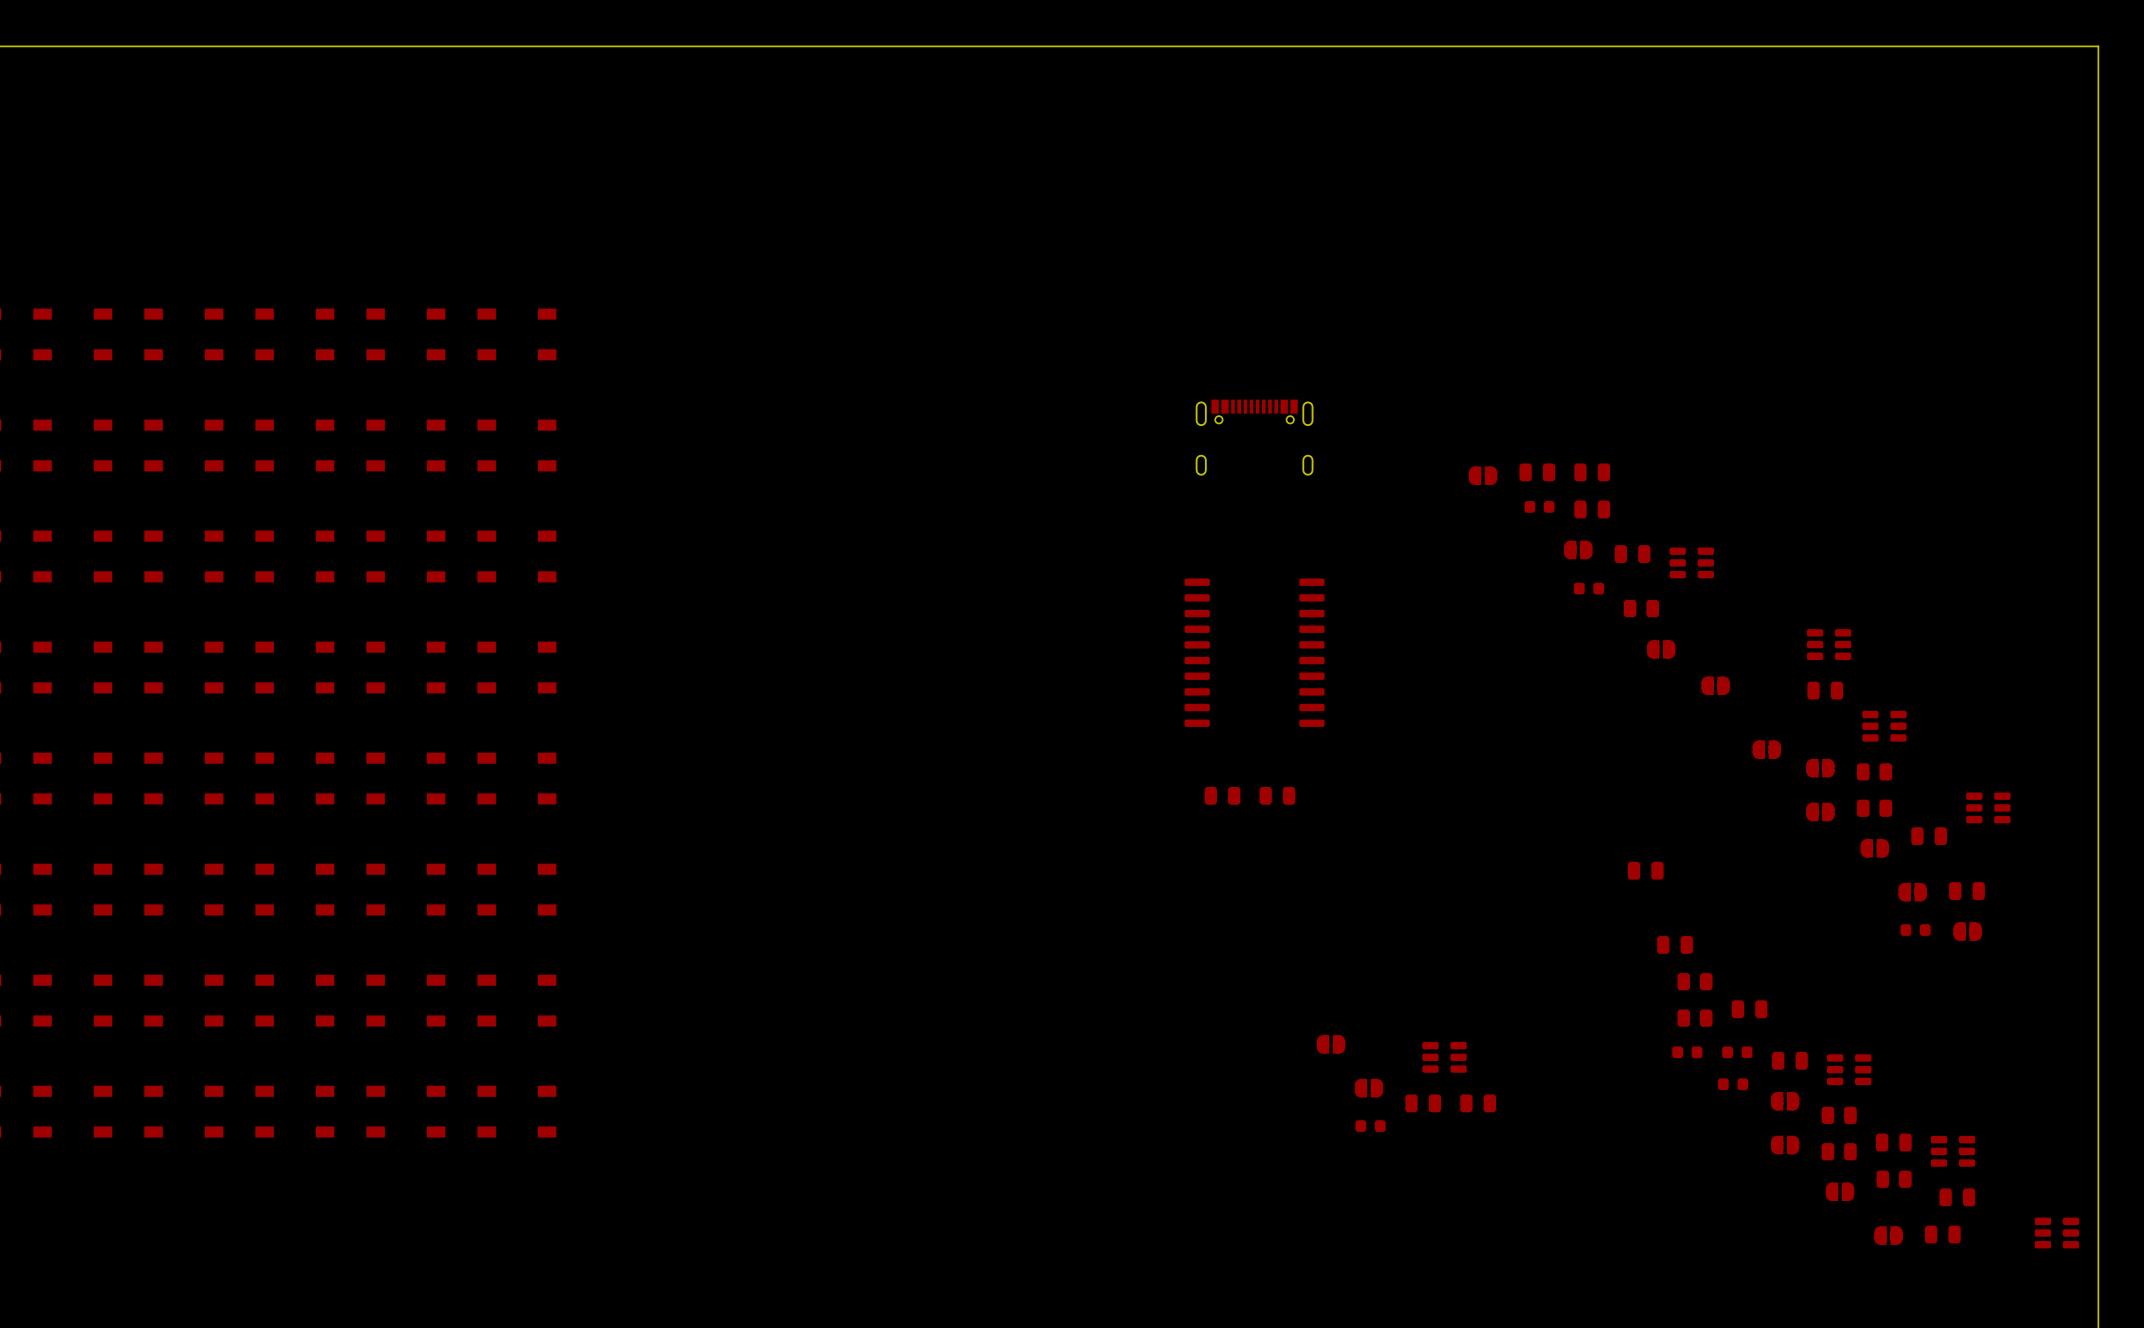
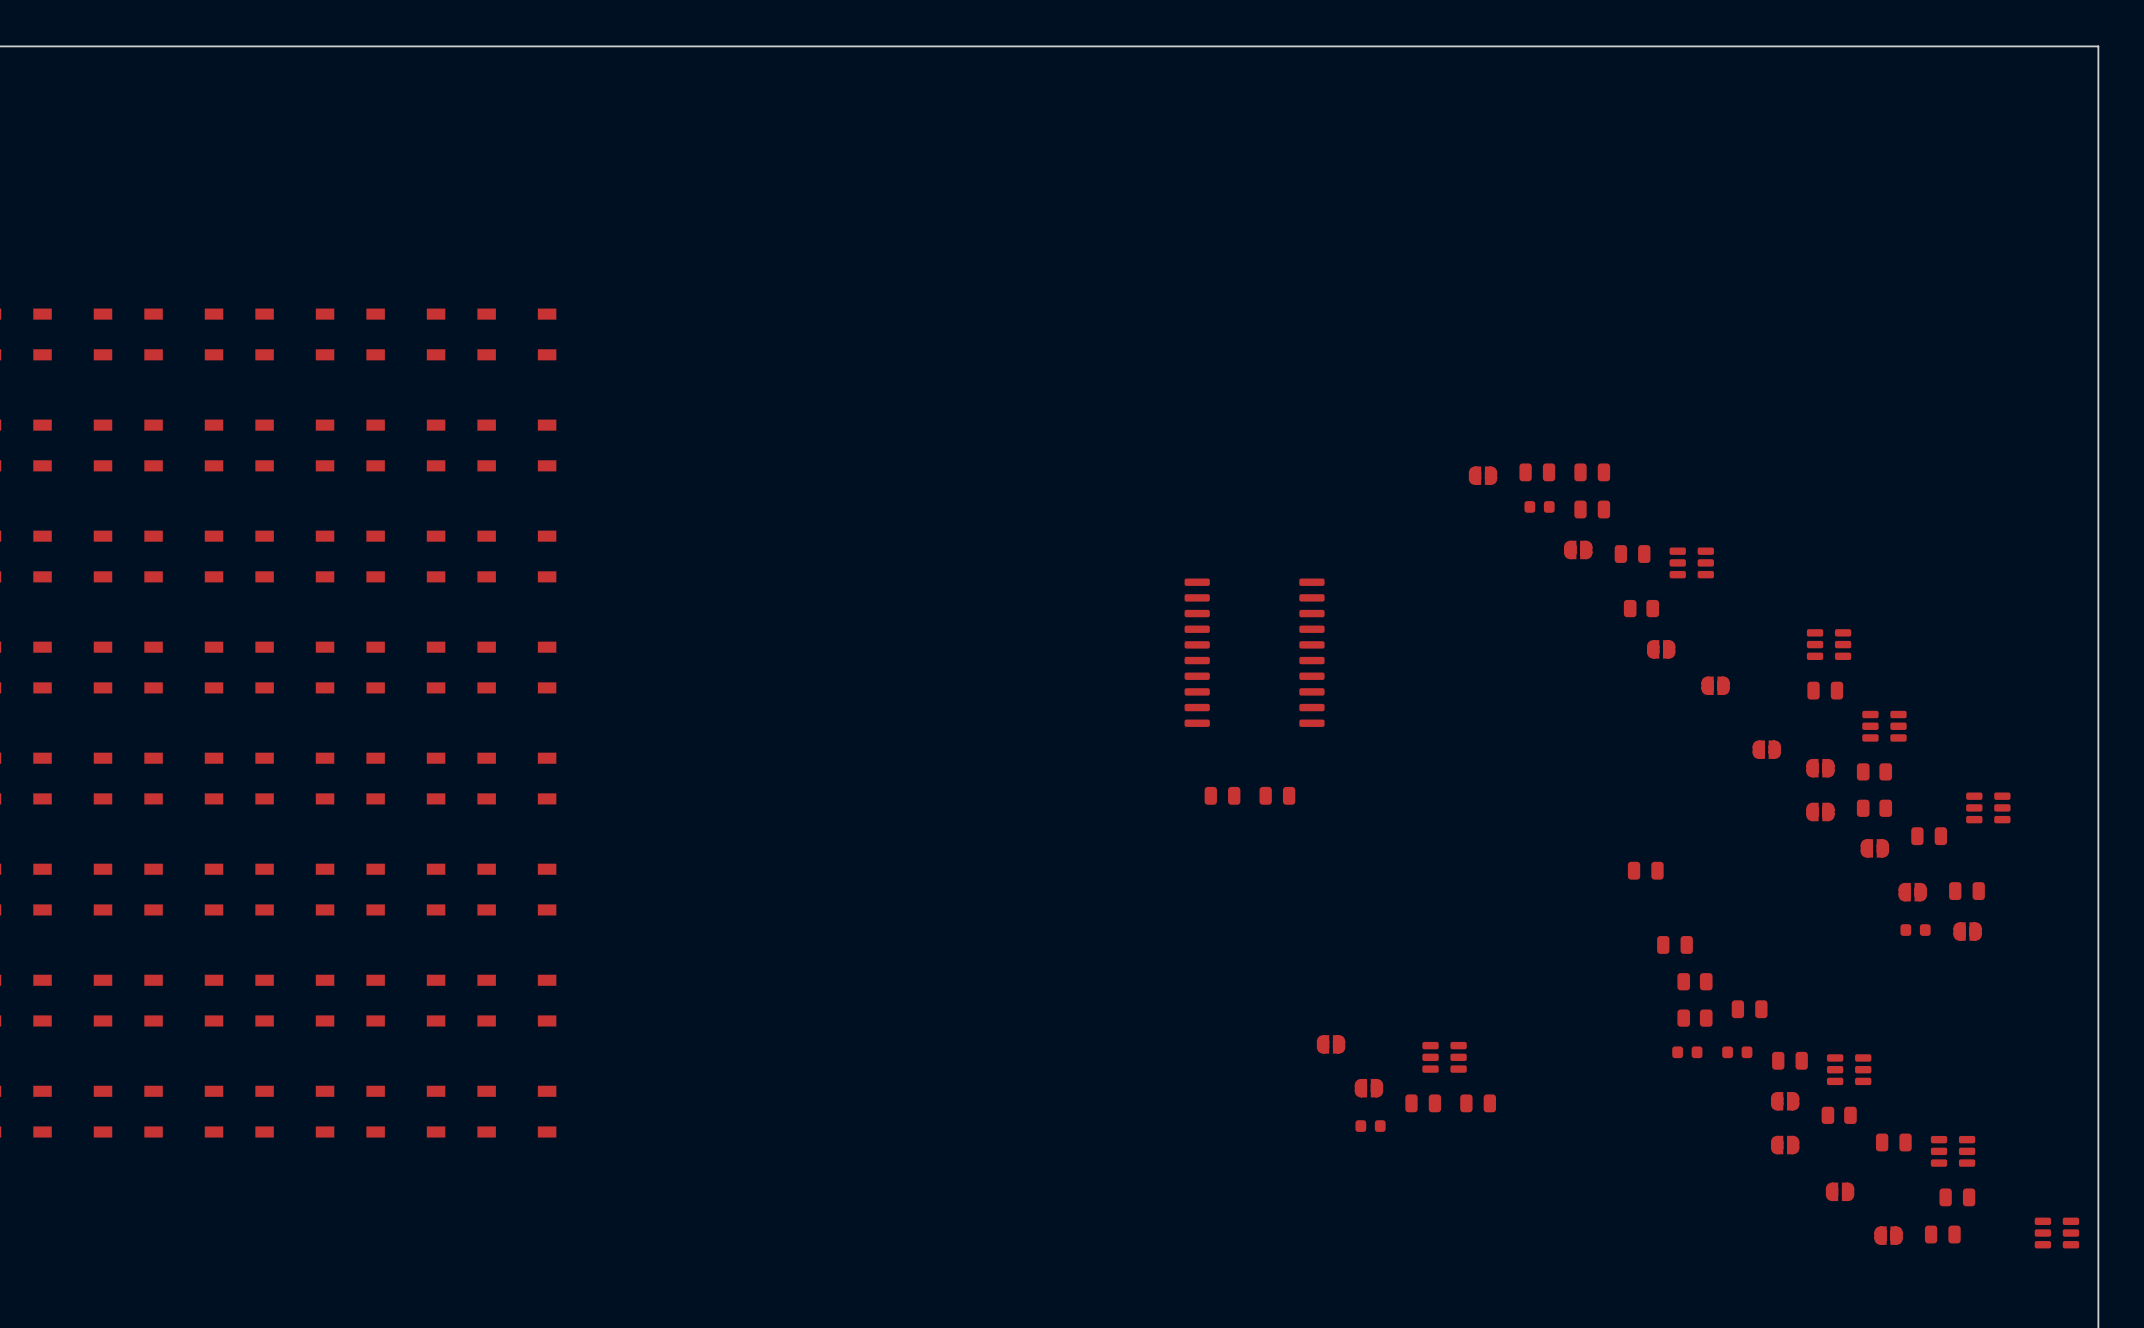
part: (1254, 437) -> none
part: (1589, 588) -> none
part: (1733, 1084) -> none
part: (1839, 1151) -> none
part: (1894, 1179) -> none

